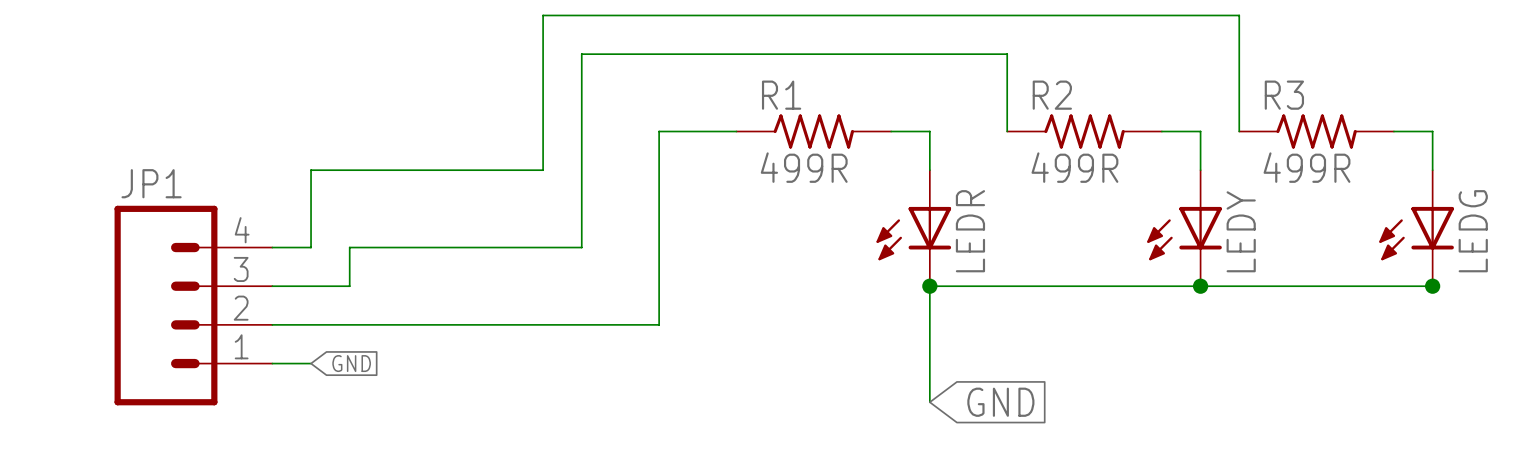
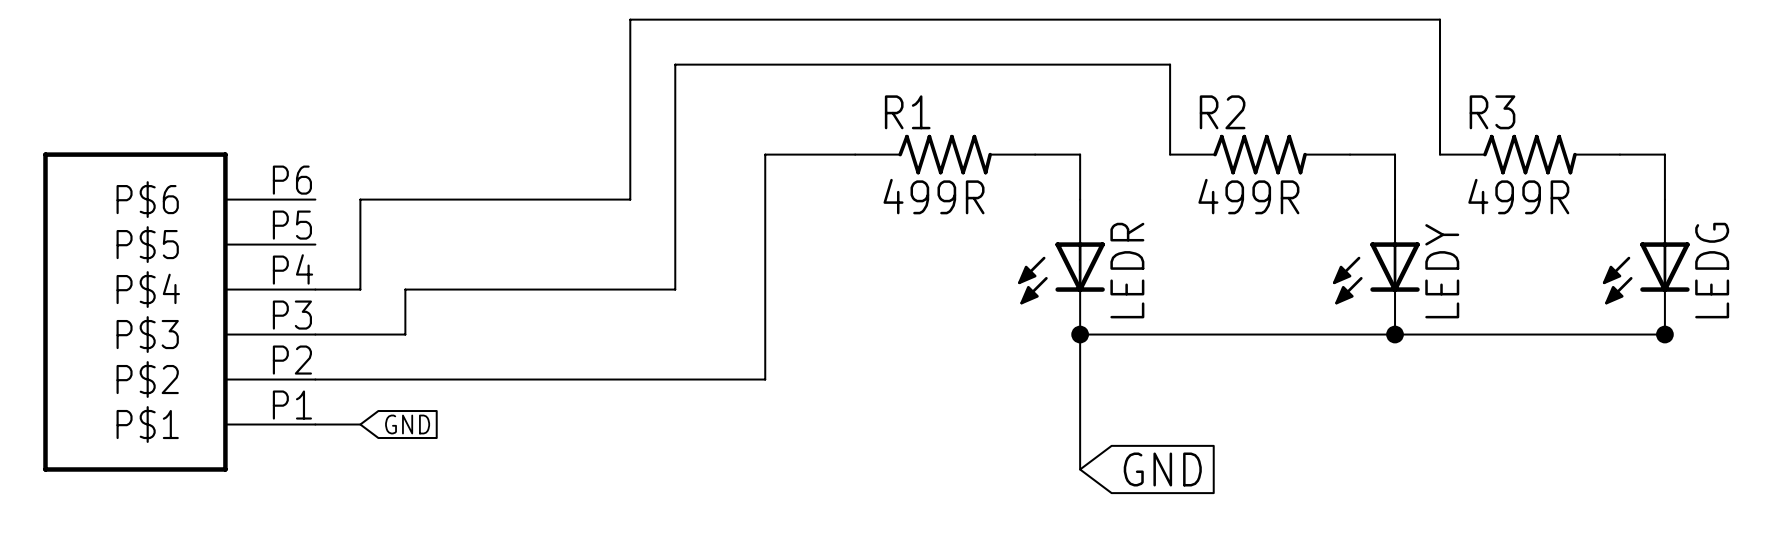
part: none -> (179, 312)
JP1: (193, 305) -> none

